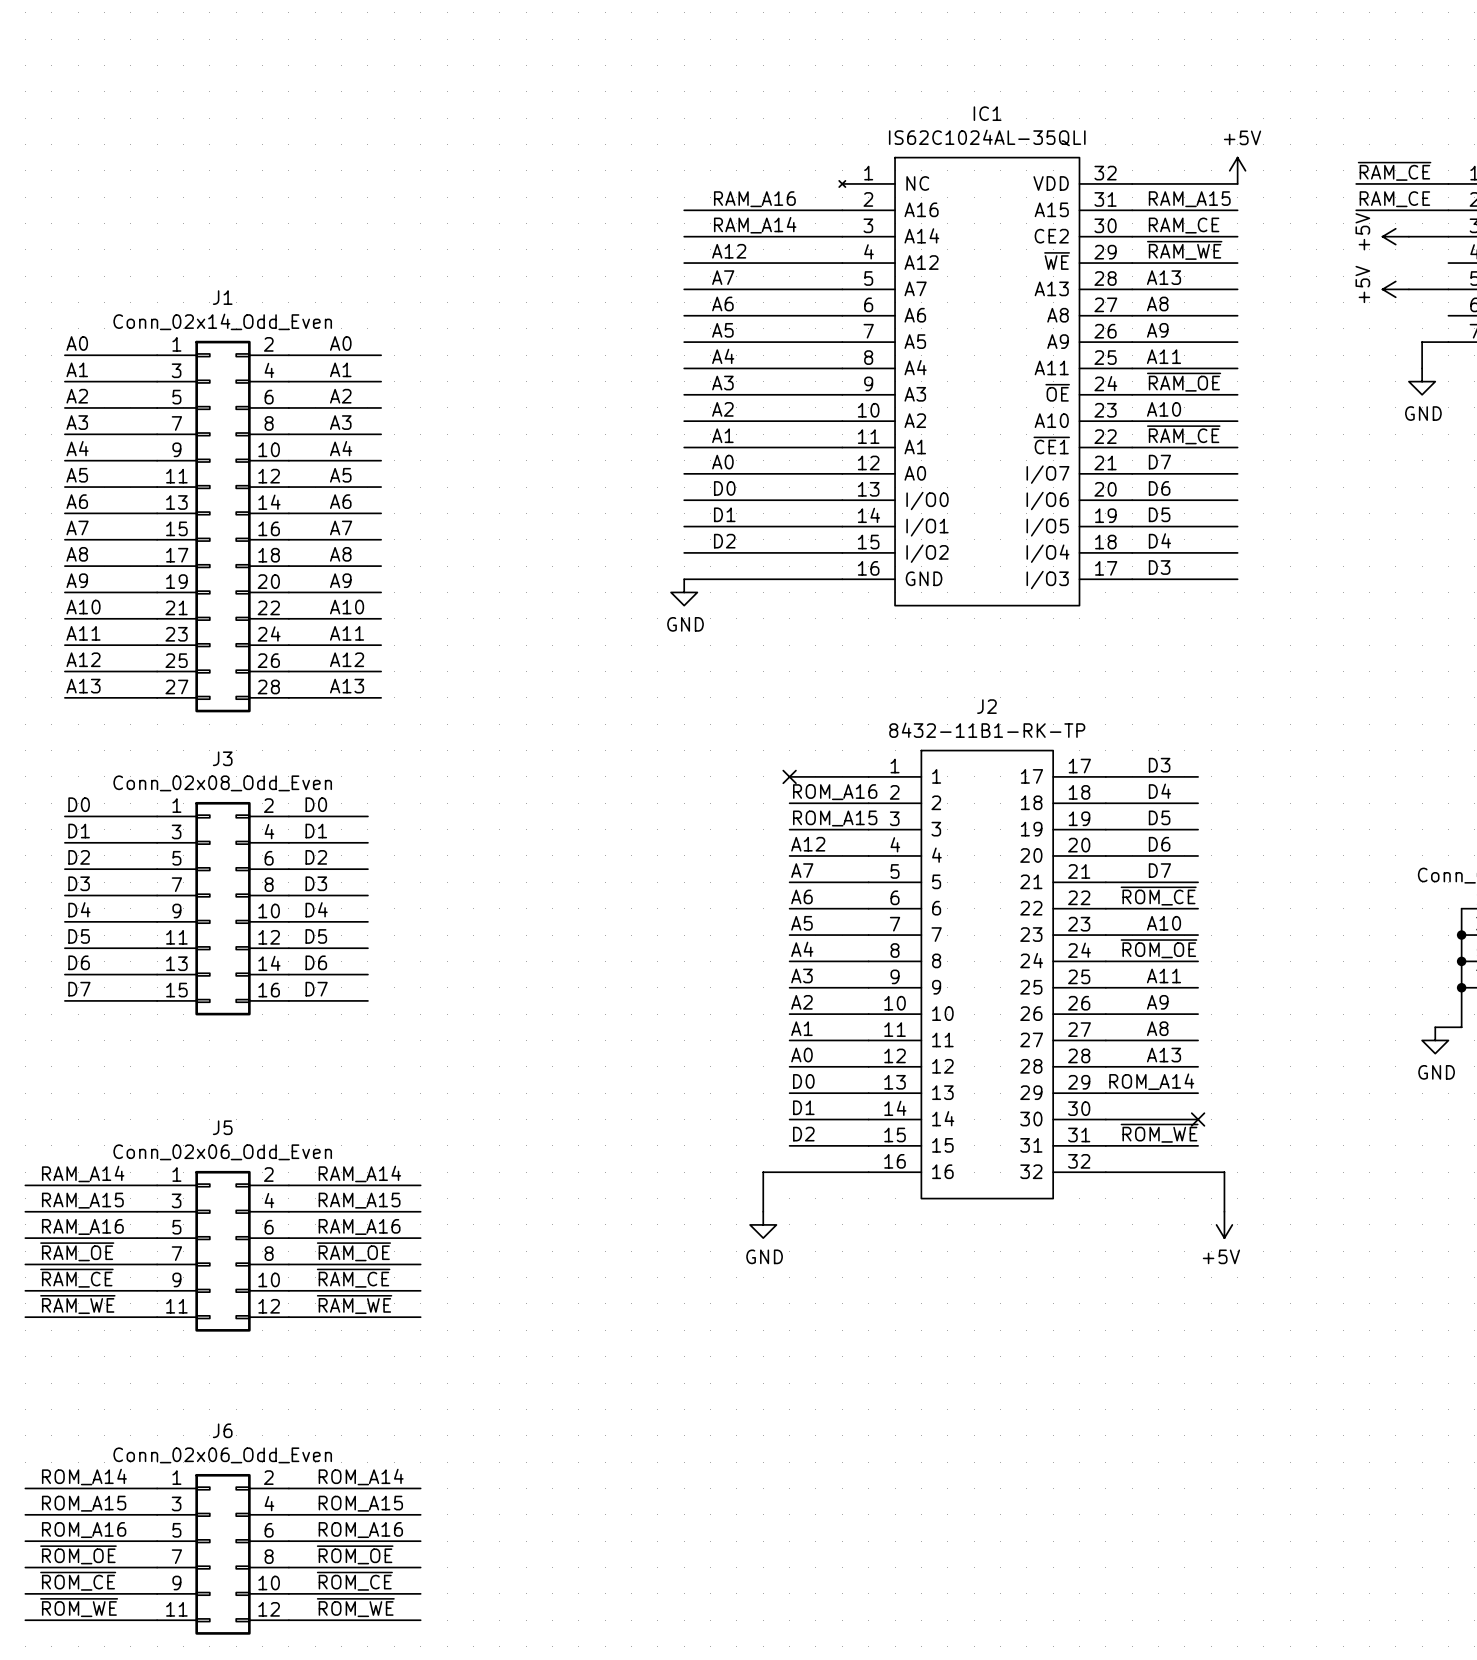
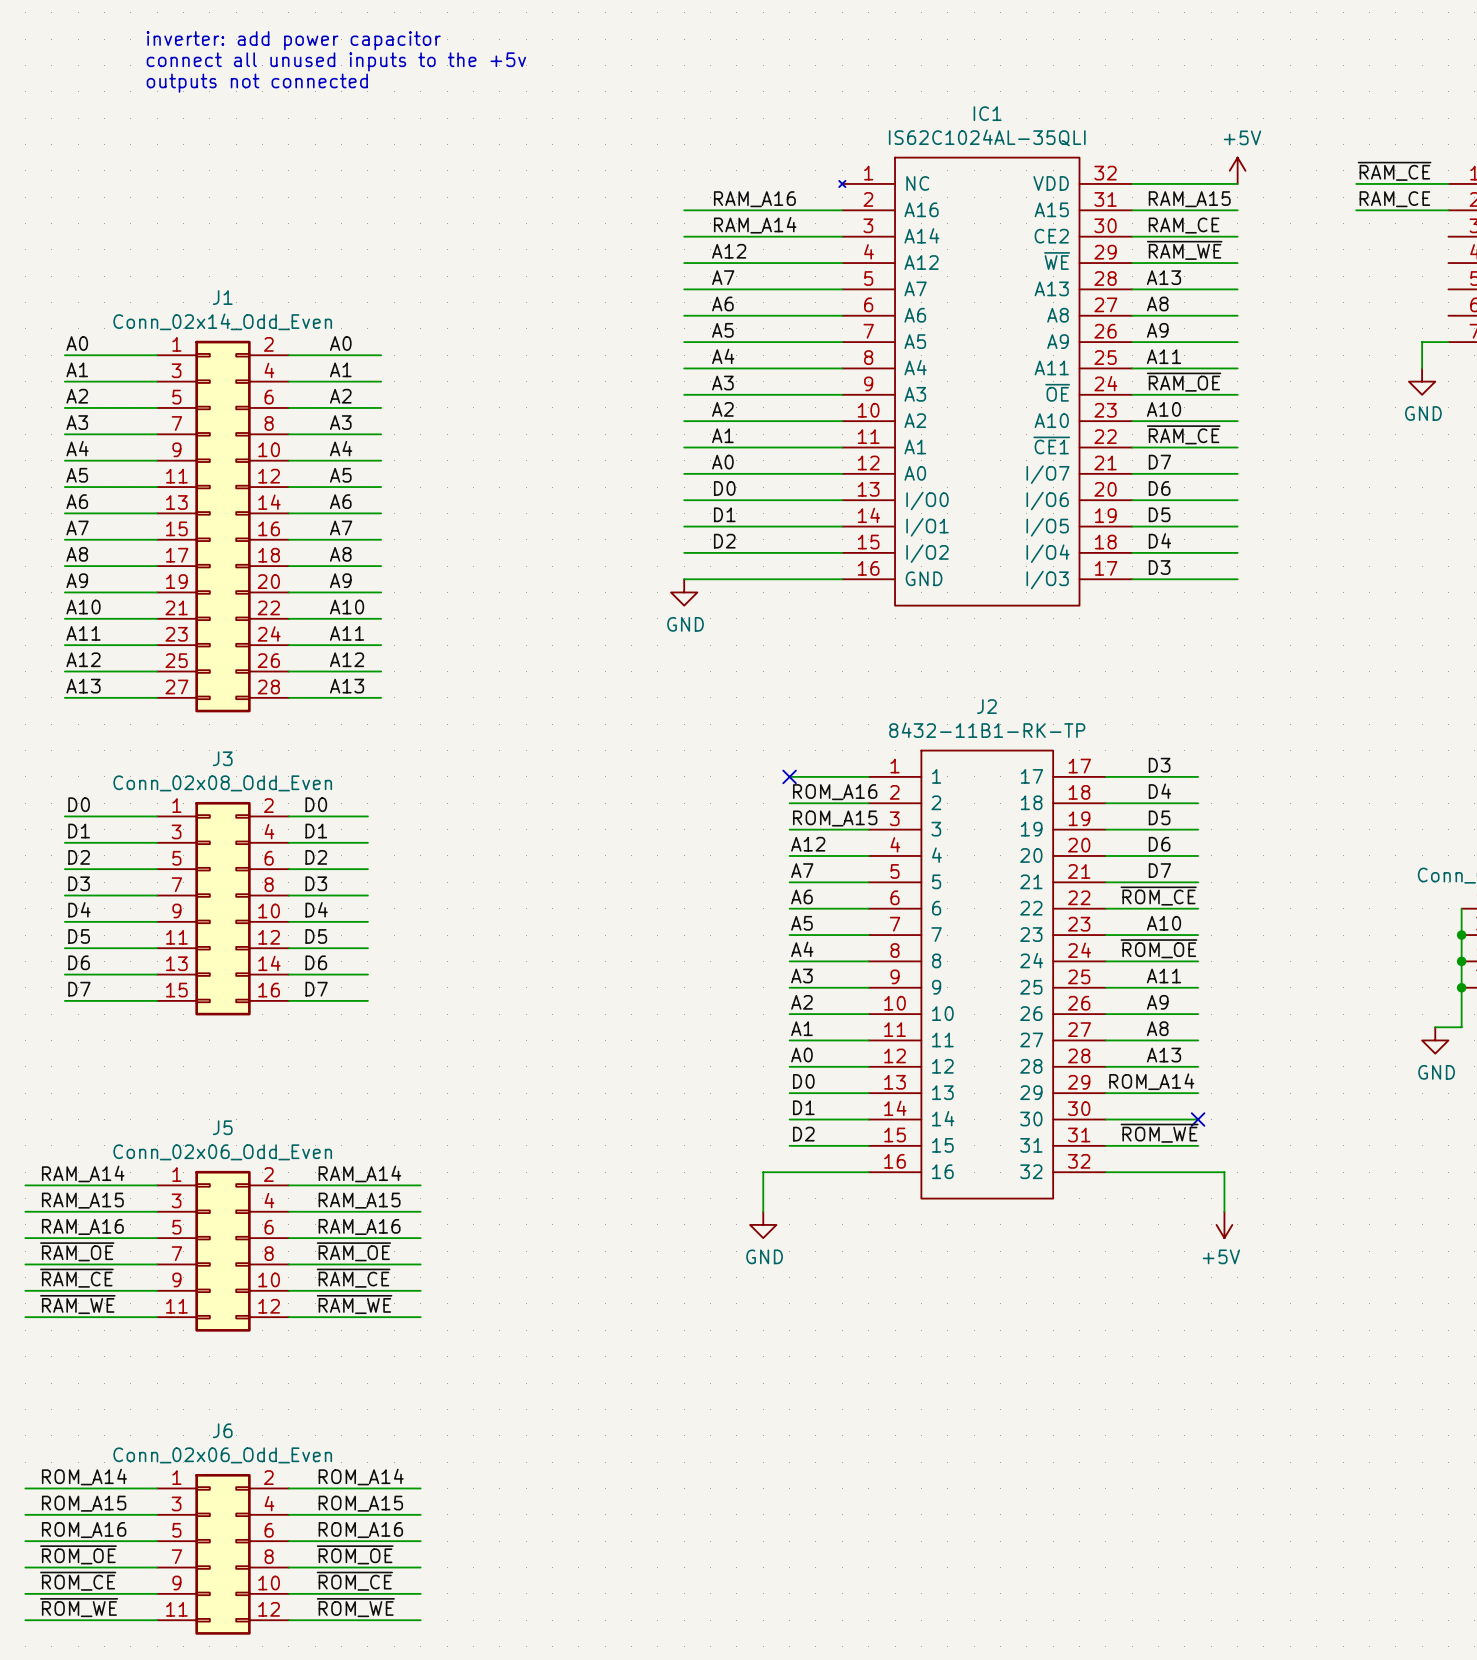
text: none -> inverter: add power capacitor (293, 40)
text: none -> connect all unused inputs to the +5v (336, 61)
text: none -> outputs not connected (257, 83)
power symbol: +5V (1395, 236) -> none
wire: (1408, 236) (1448, 236) -> none
power symbol: +5V (1395, 289) -> none
wire: (1408, 289) (1448, 289) -> none

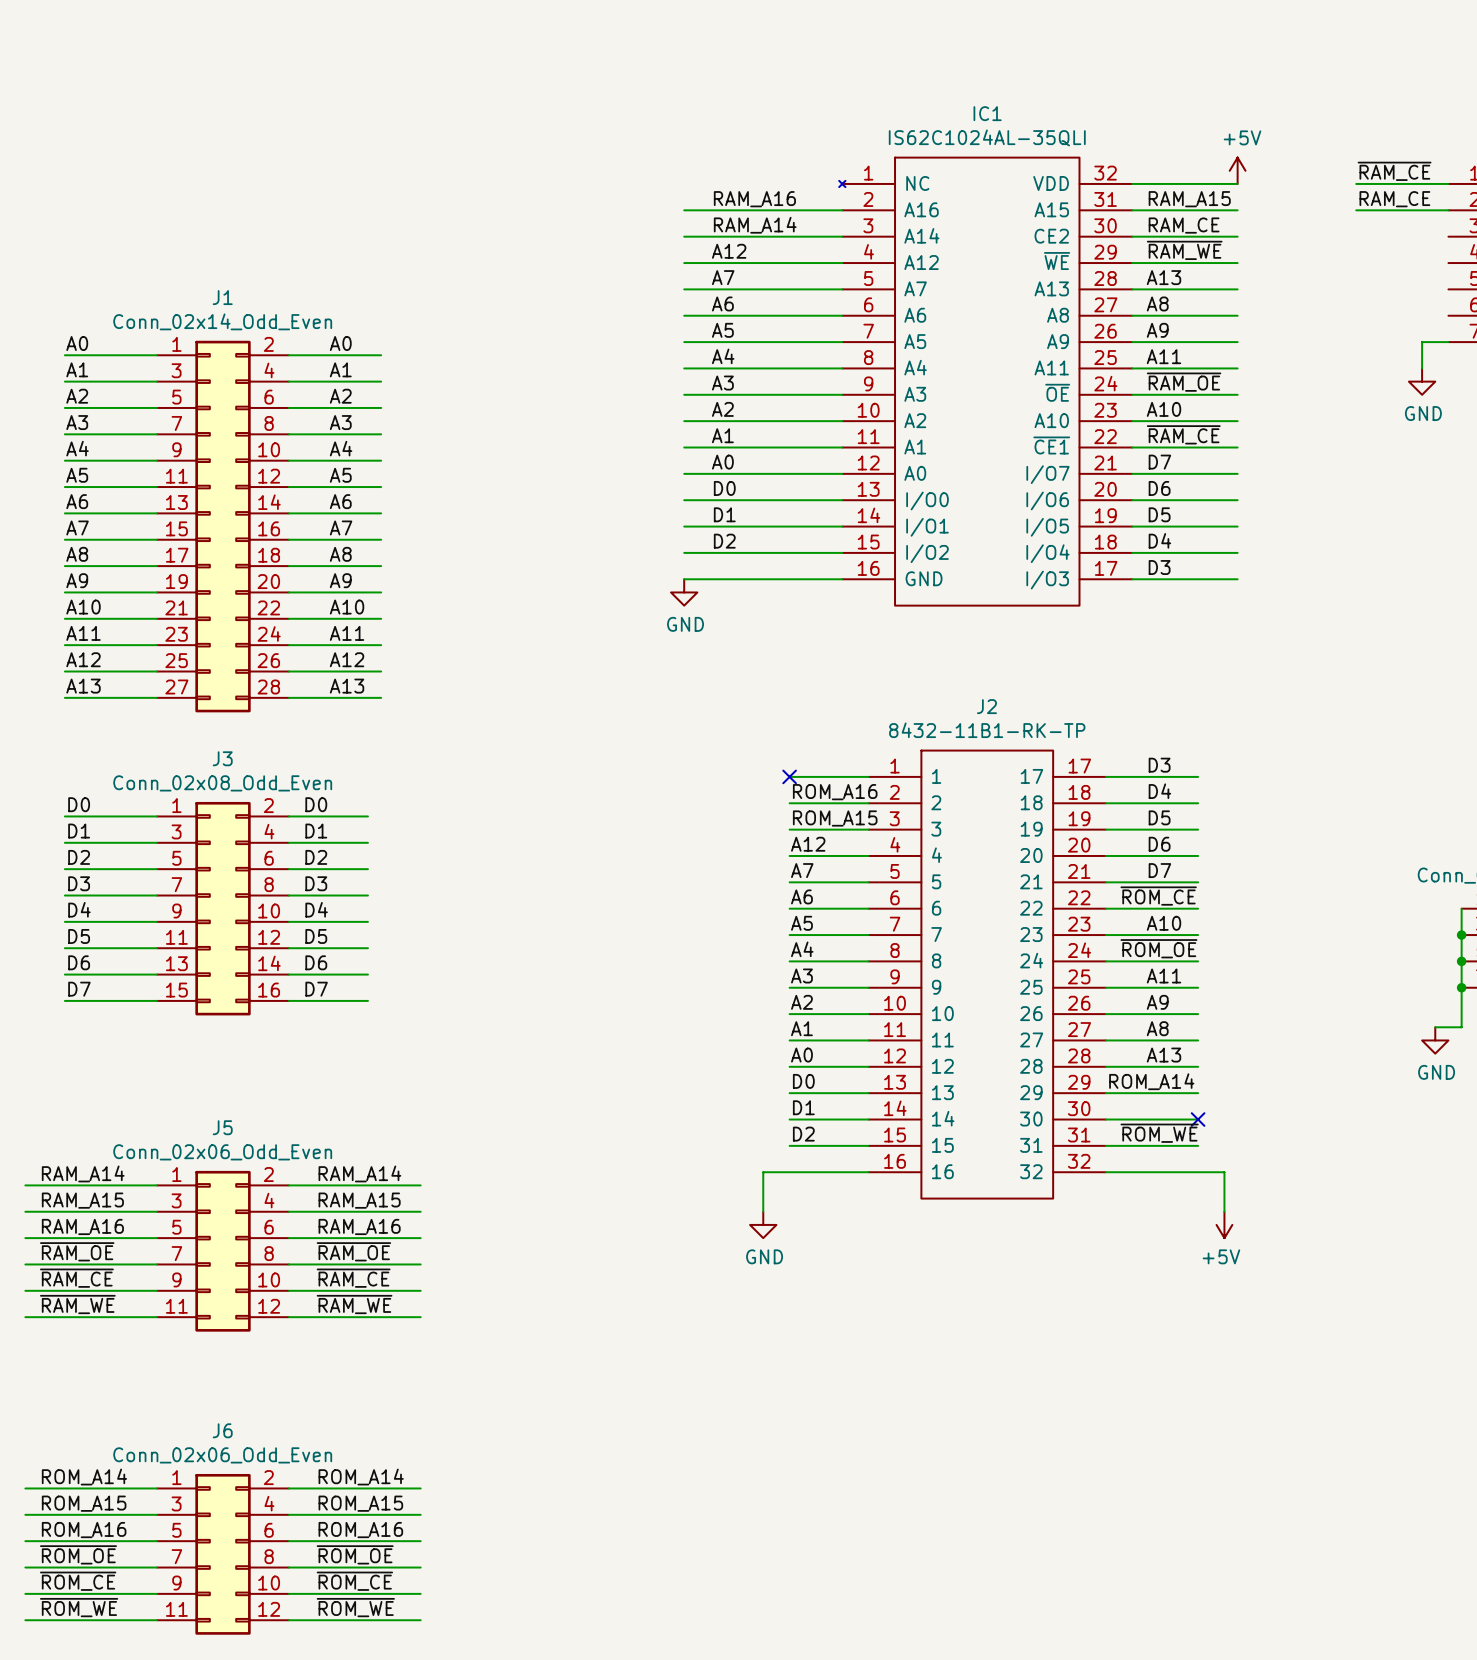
text: inverter: add power capacitor (293, 40) -> none
text: connect all unused inputs to the +5v (336, 61) -> none
text: outputs not connected (257, 83) -> none

